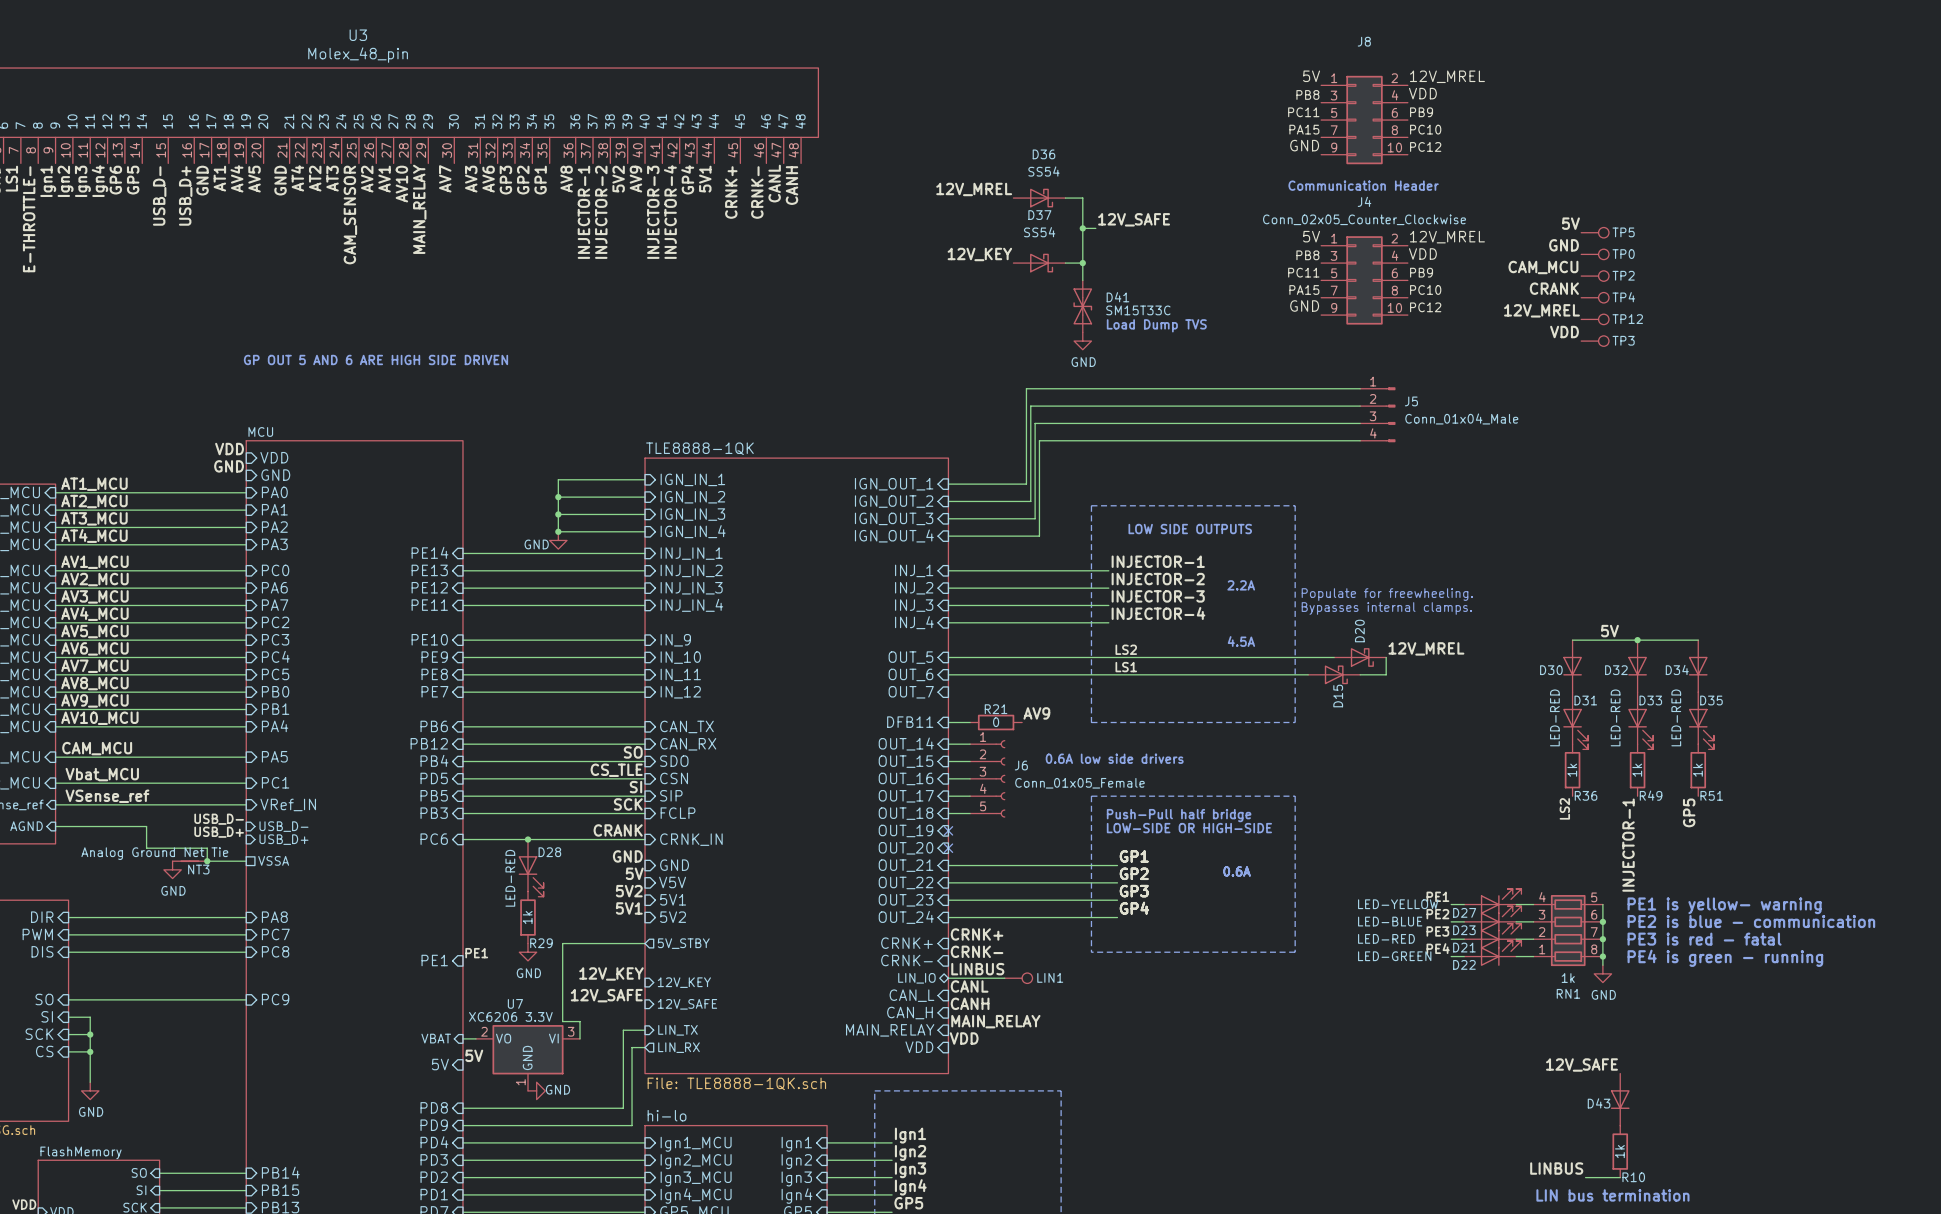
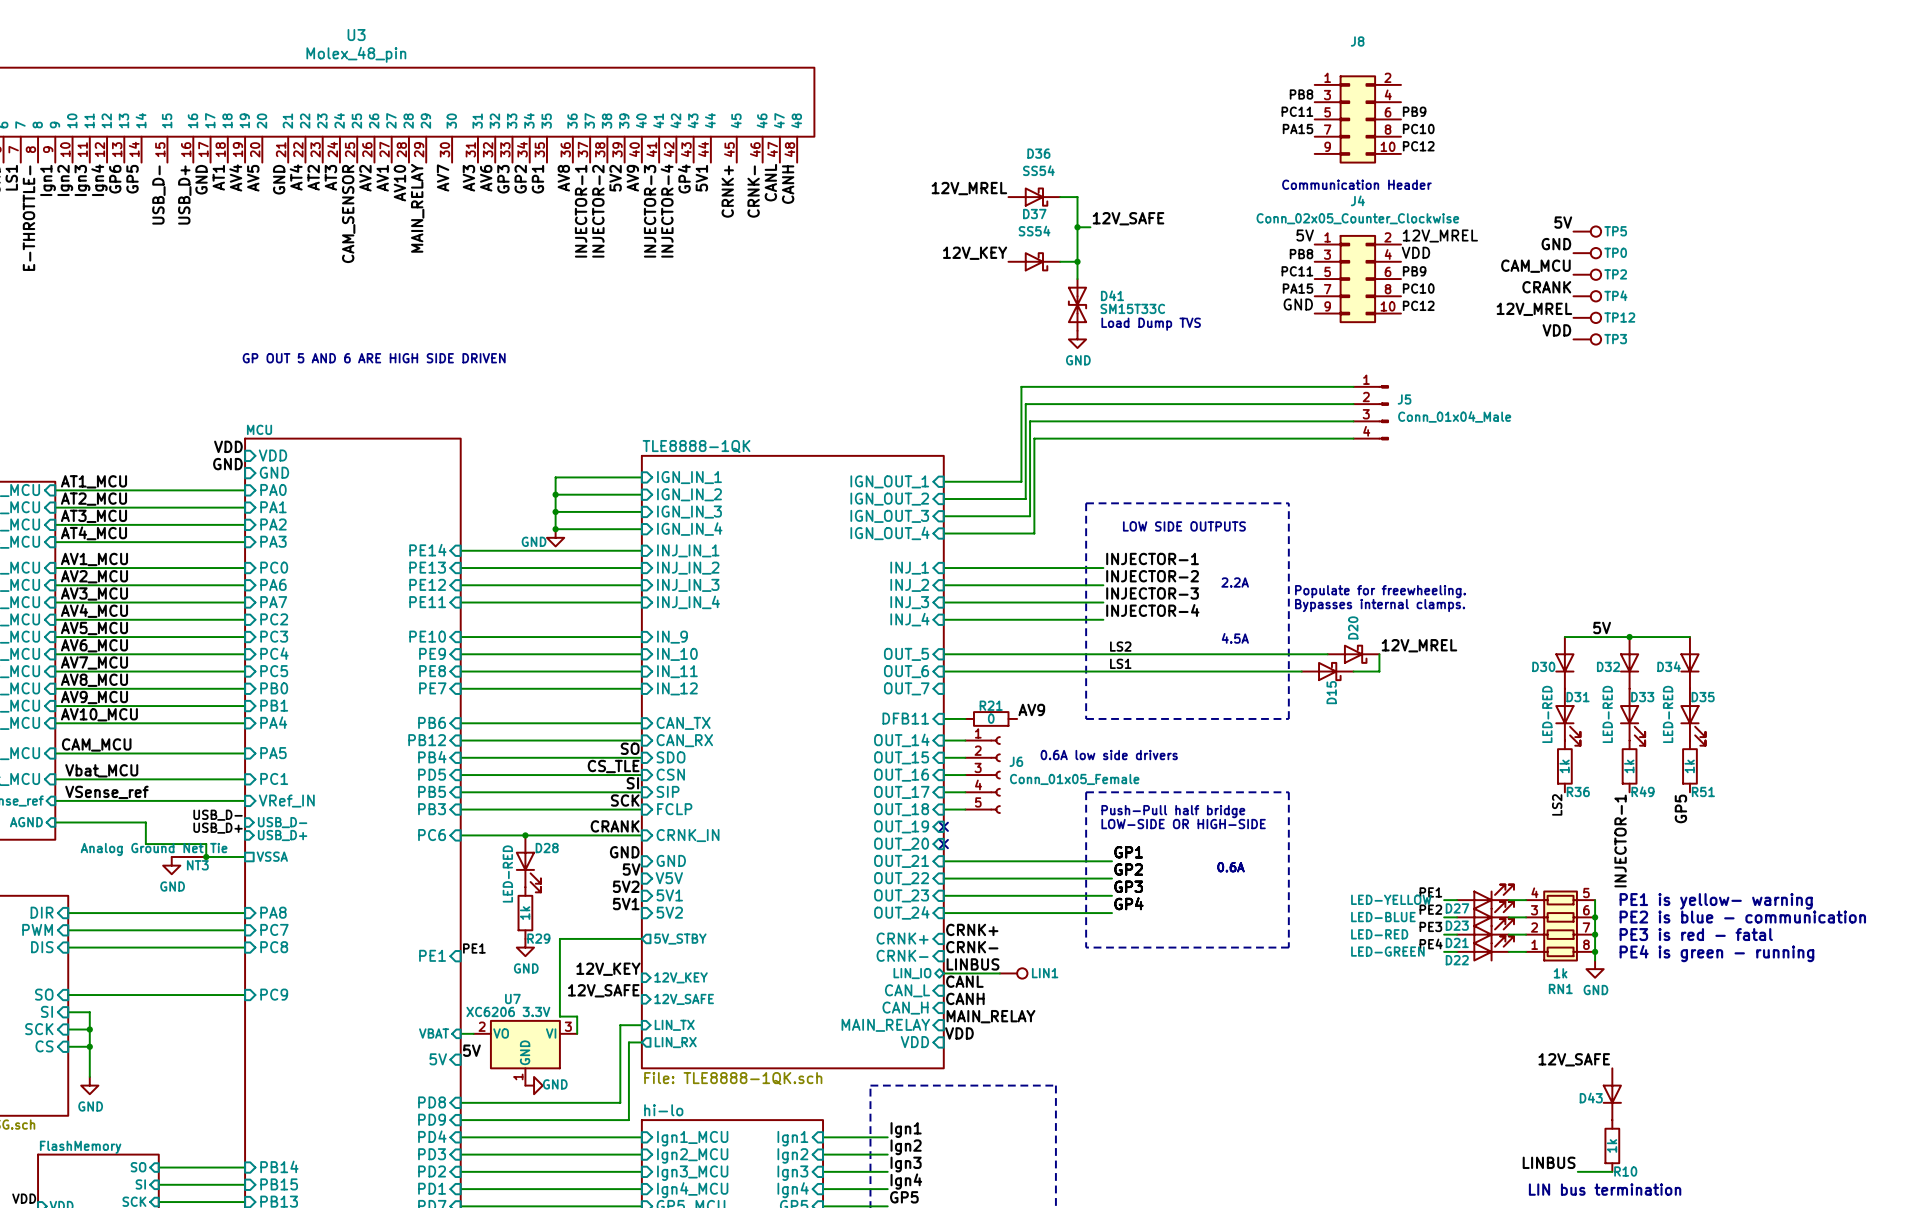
label: 5V (1311, 76) -> none
label: 12V_MREL (1447, 76) -> none
label: VDD (1422, 93) -> none
label: GND (1304, 145) -> none

